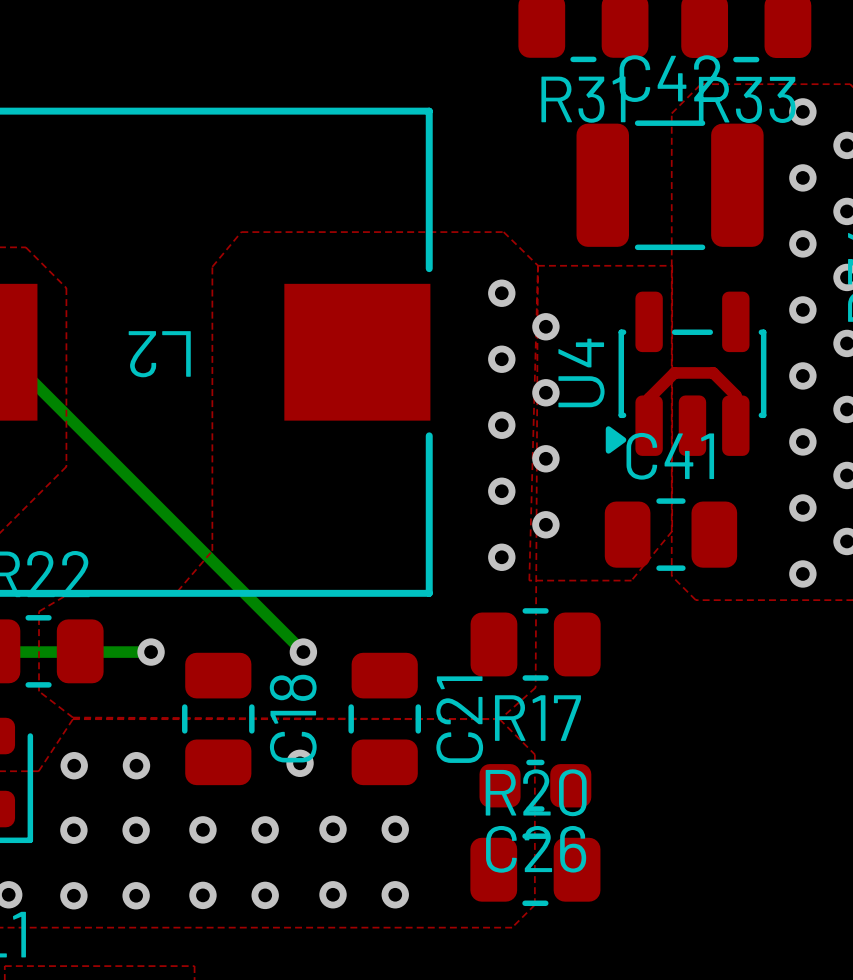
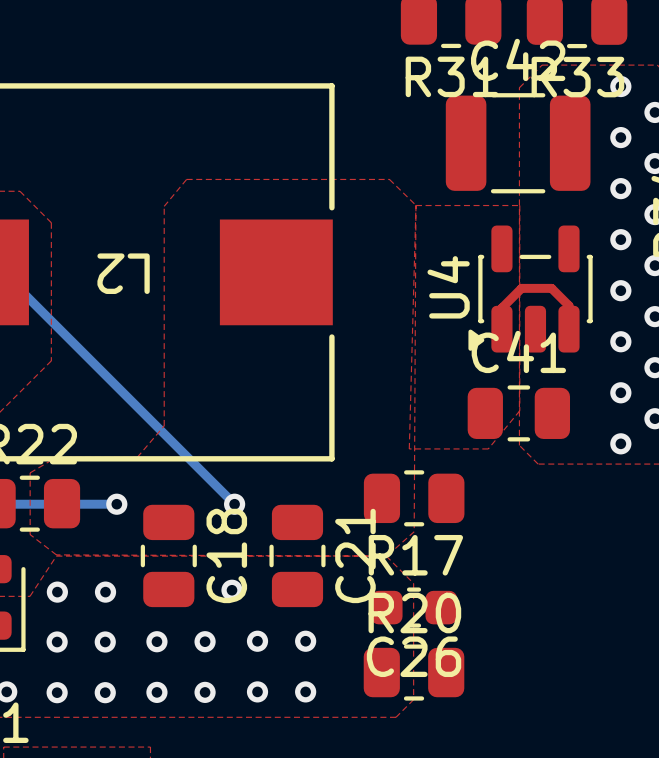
via: (501, 293) -> none
via: (545, 326) -> none
via: (501, 359) -> none
via: (545, 392) -> none
via: (501, 425) -> none
via: (545, 458) -> none
via: (501, 491) -> none
via: (545, 524) -> none
via: (501, 557) -> none

